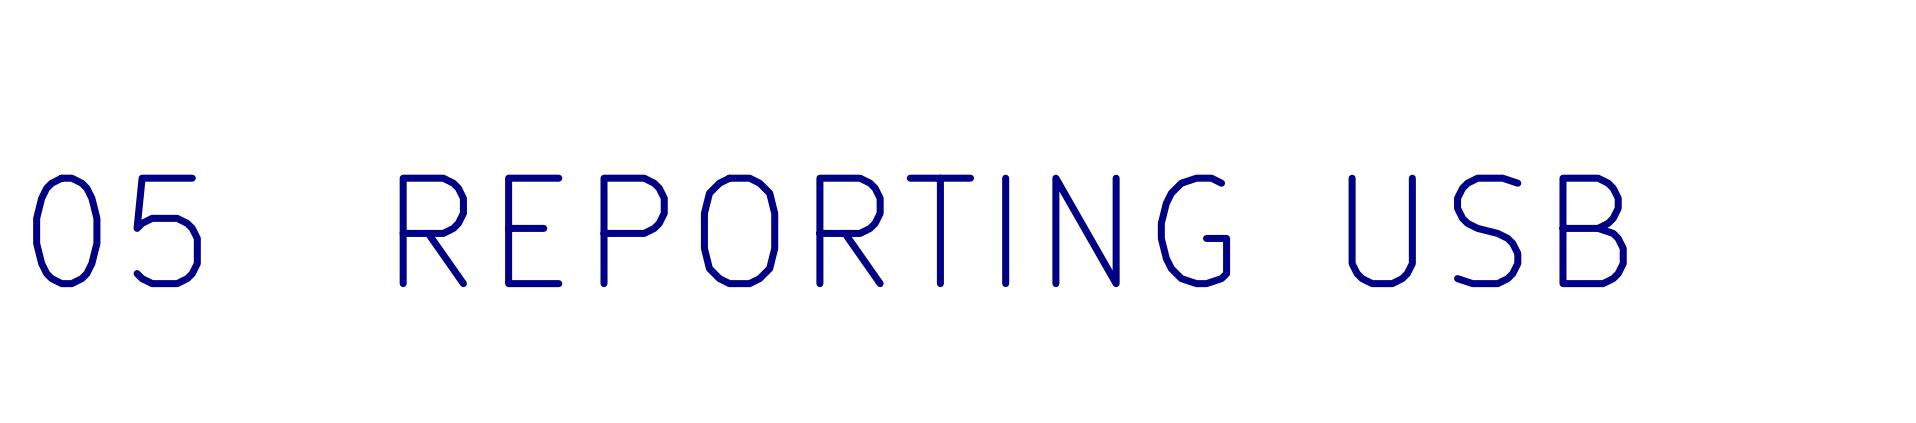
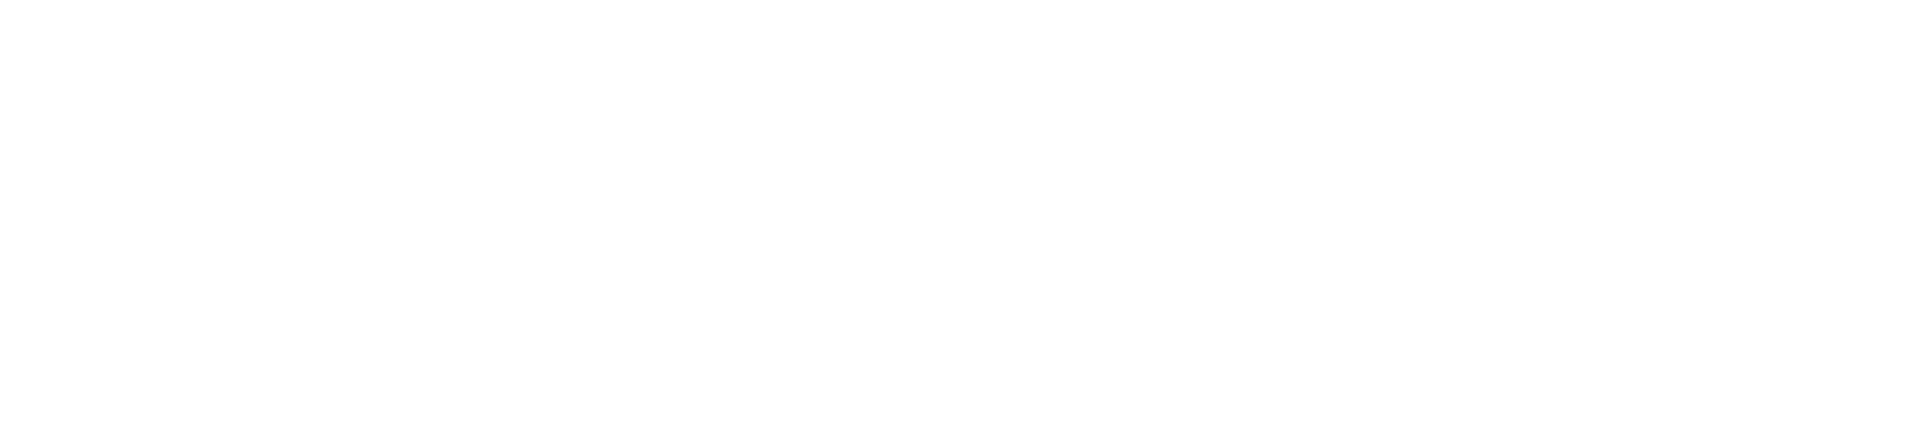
text: 05 REPORTING USB (829, 230) -> none

